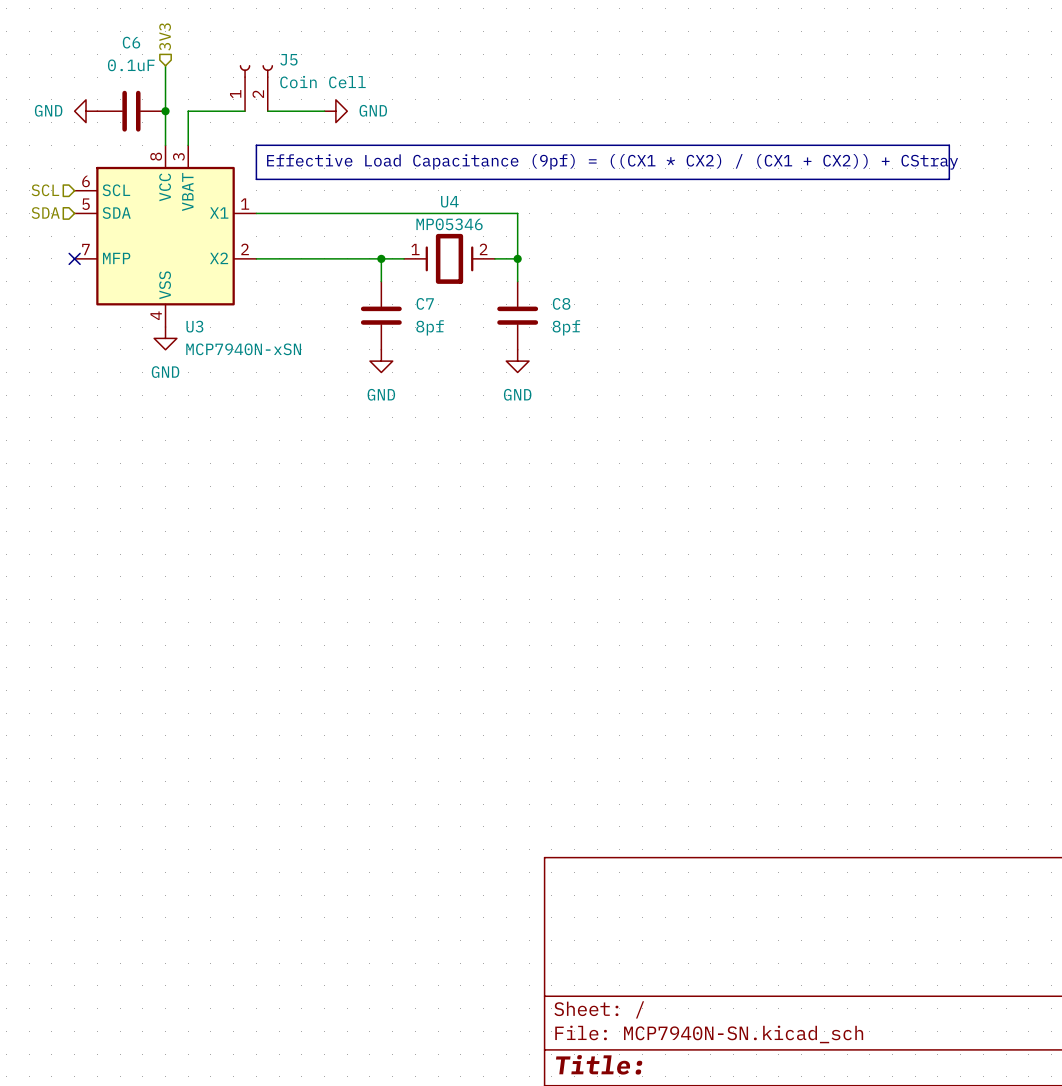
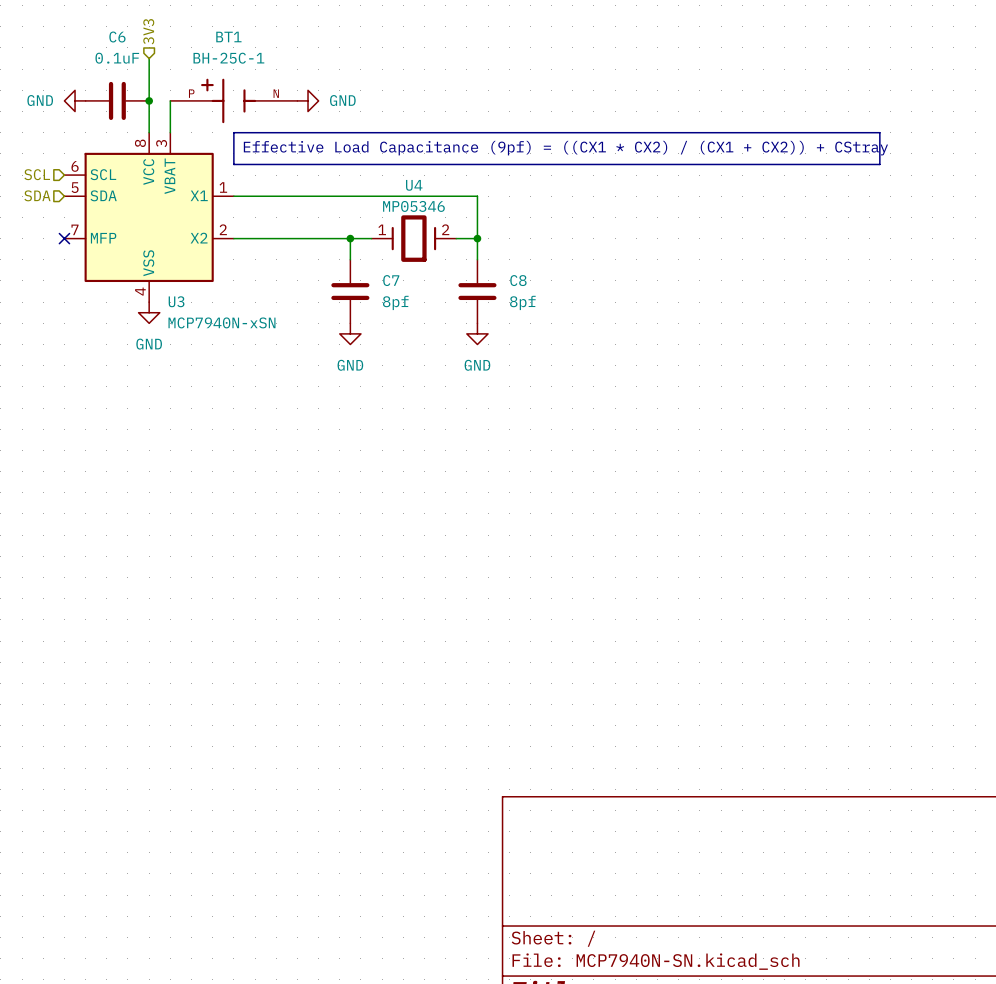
J5: Coin Cell (256, 88) -> none
BT1: none -> BH-25C-1 (233, 100)

